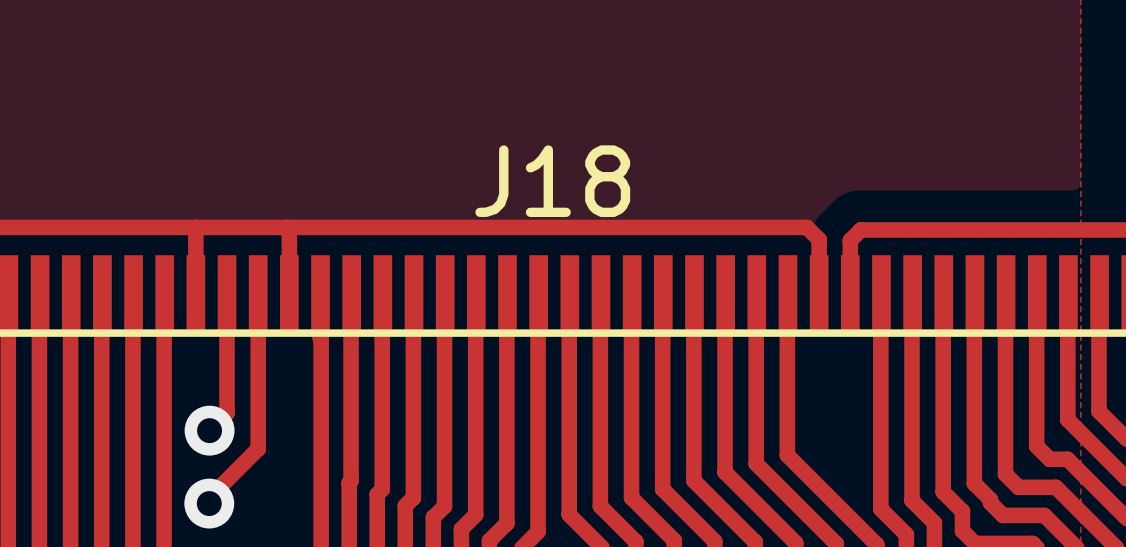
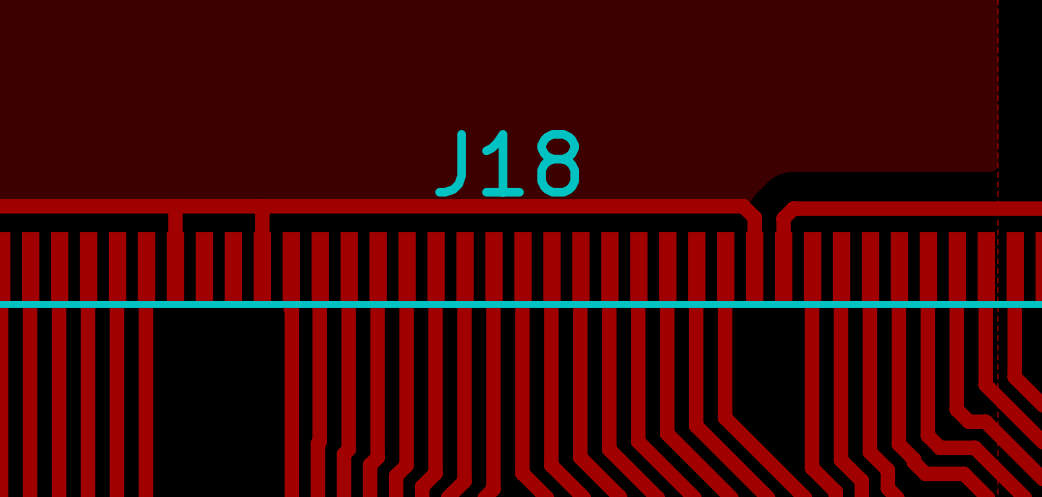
track: (227, 294) (227, 413) (209, 430) -> none
track: (258, 294) (258, 448) (209, 497) (209, 503) -> none
via: (209, 430) -> none
via: (209, 503) -> none

